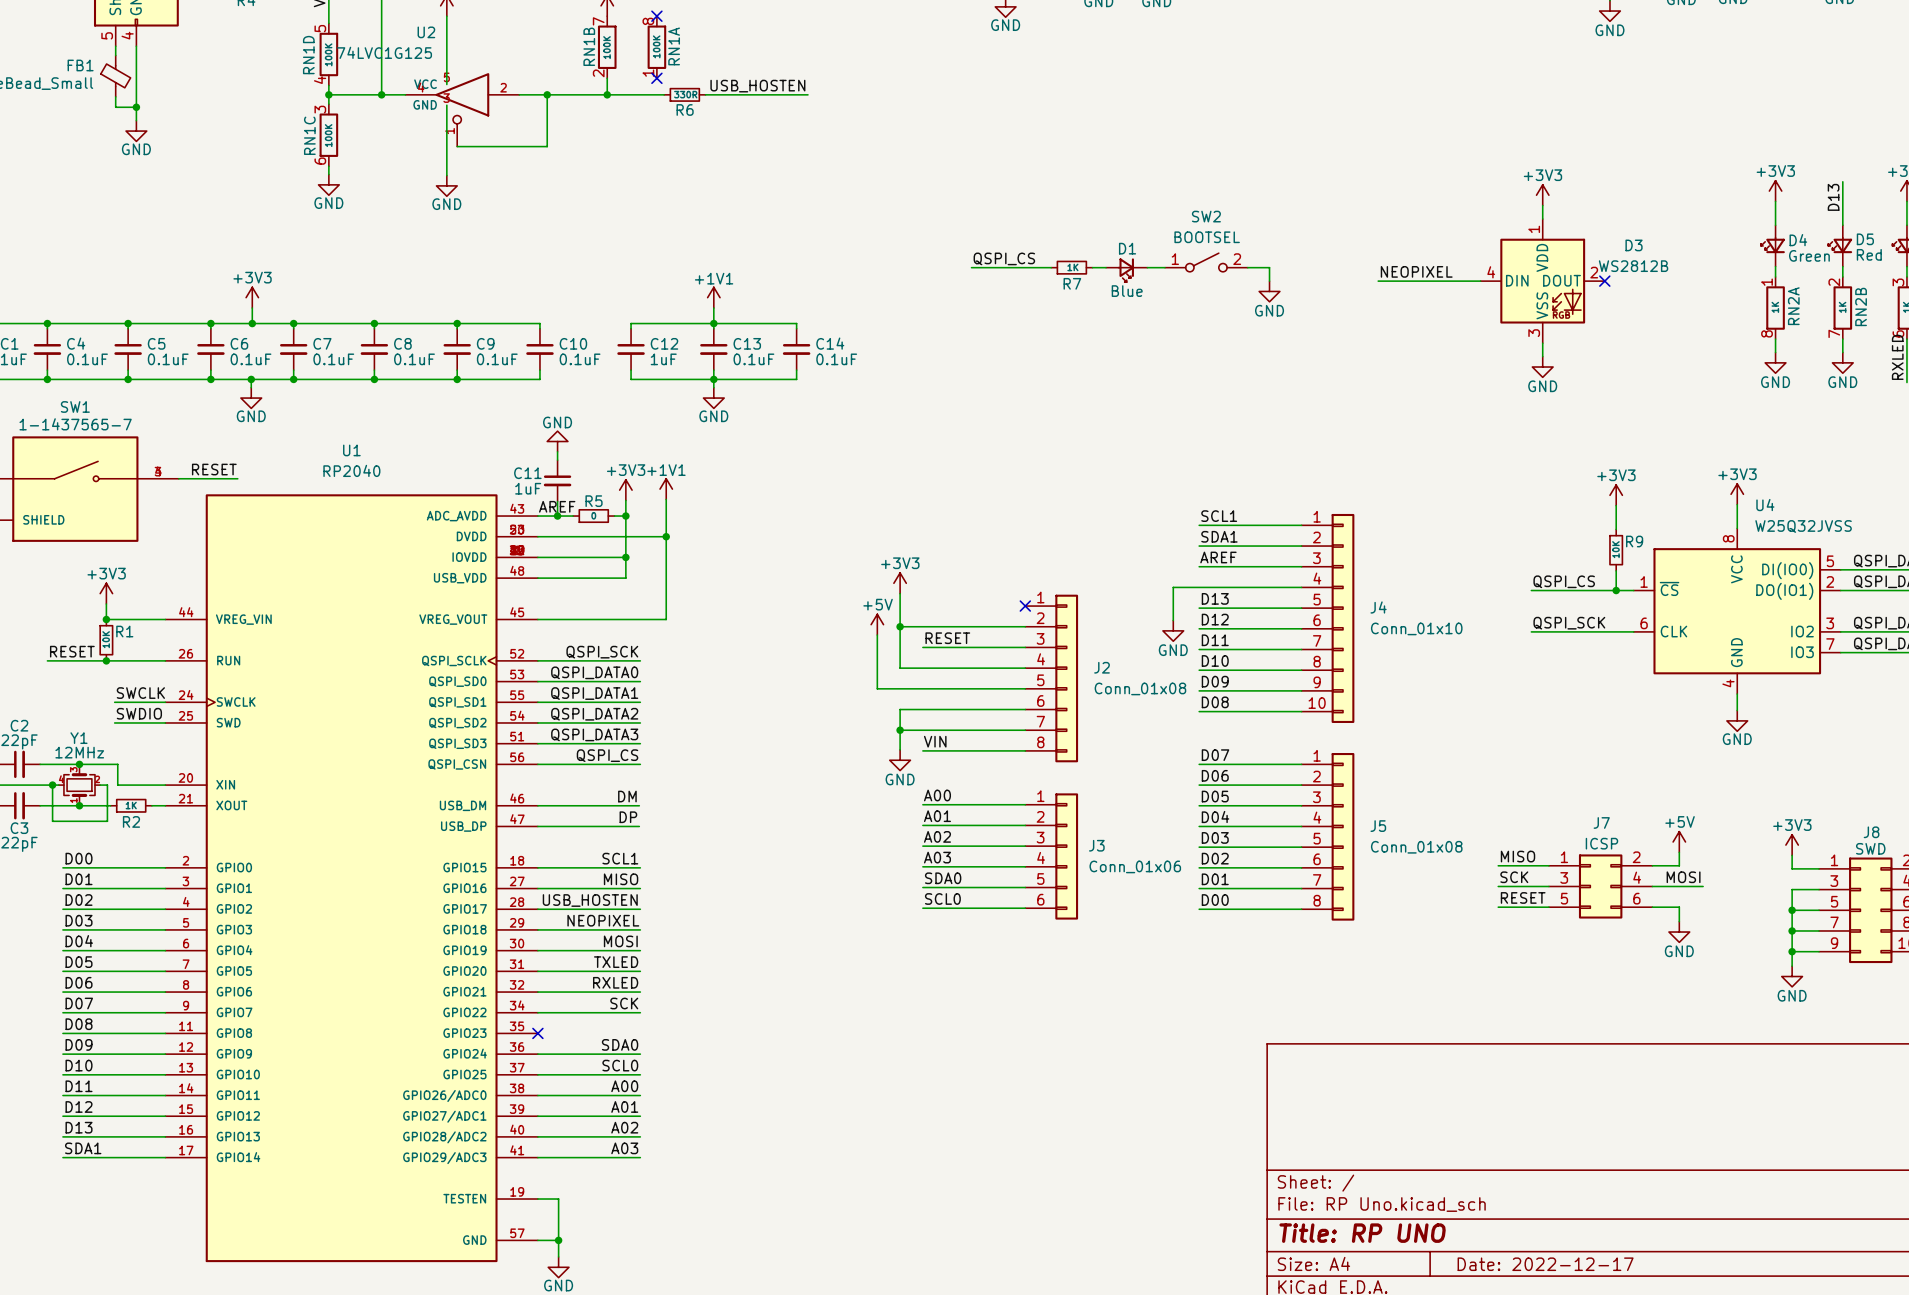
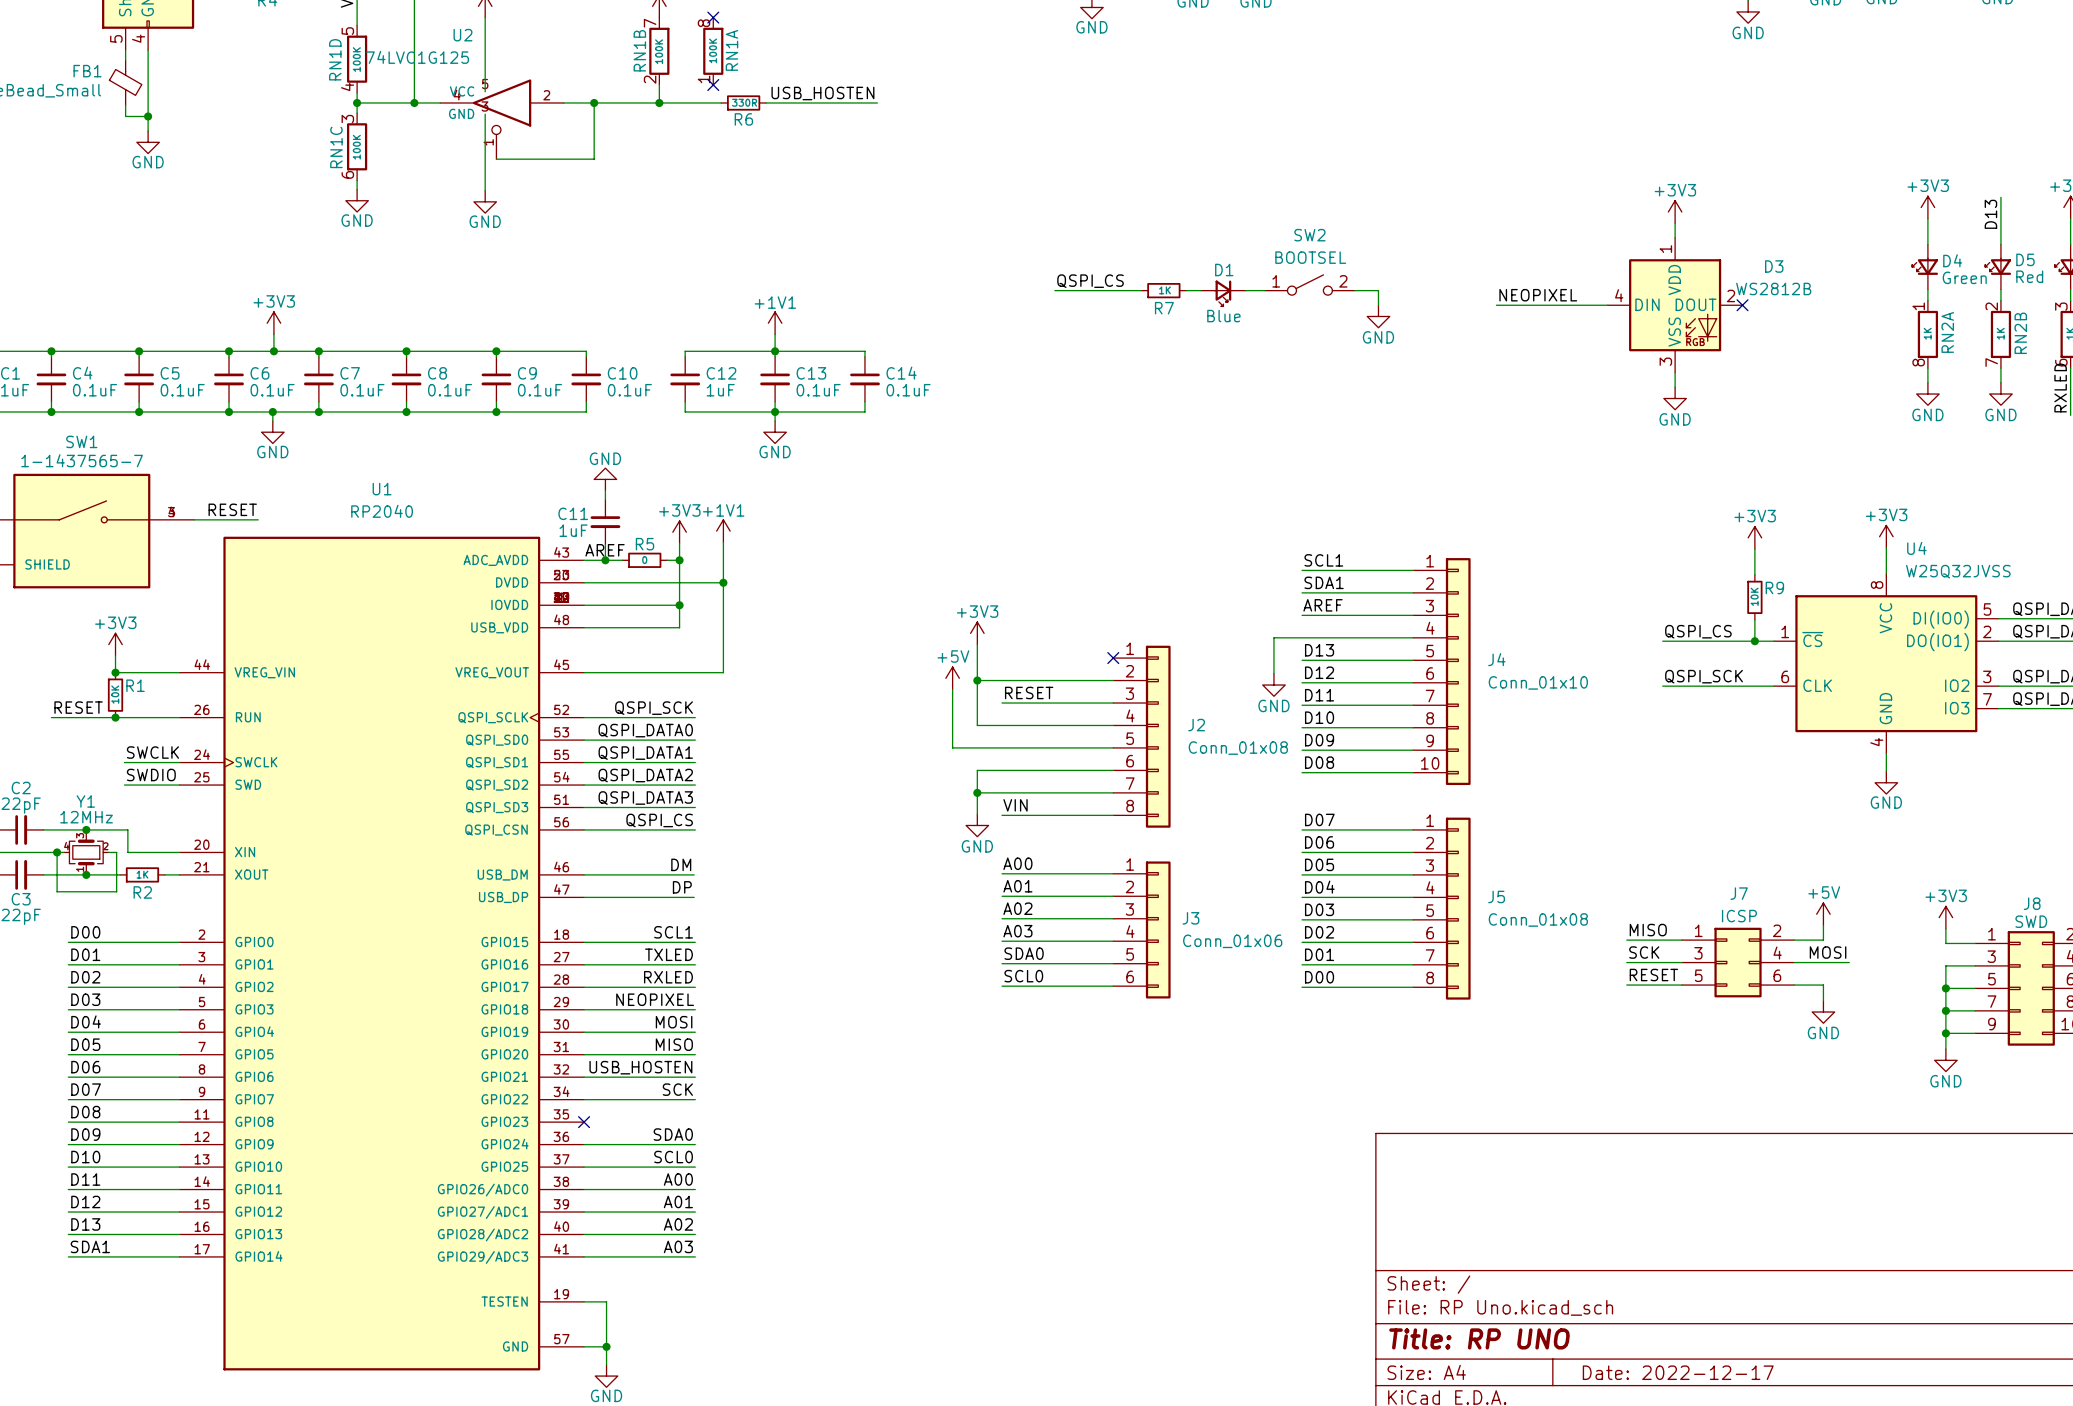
label: MISO (621, 879) -> TXLED (669, 954)
label: USB_HOSTEN (590, 900) -> RXLED (668, 977)
label: TXLED (616, 962) -> MISO (674, 1044)
label: RXLED (615, 982) -> USB_HOSTEN (640, 1067)

